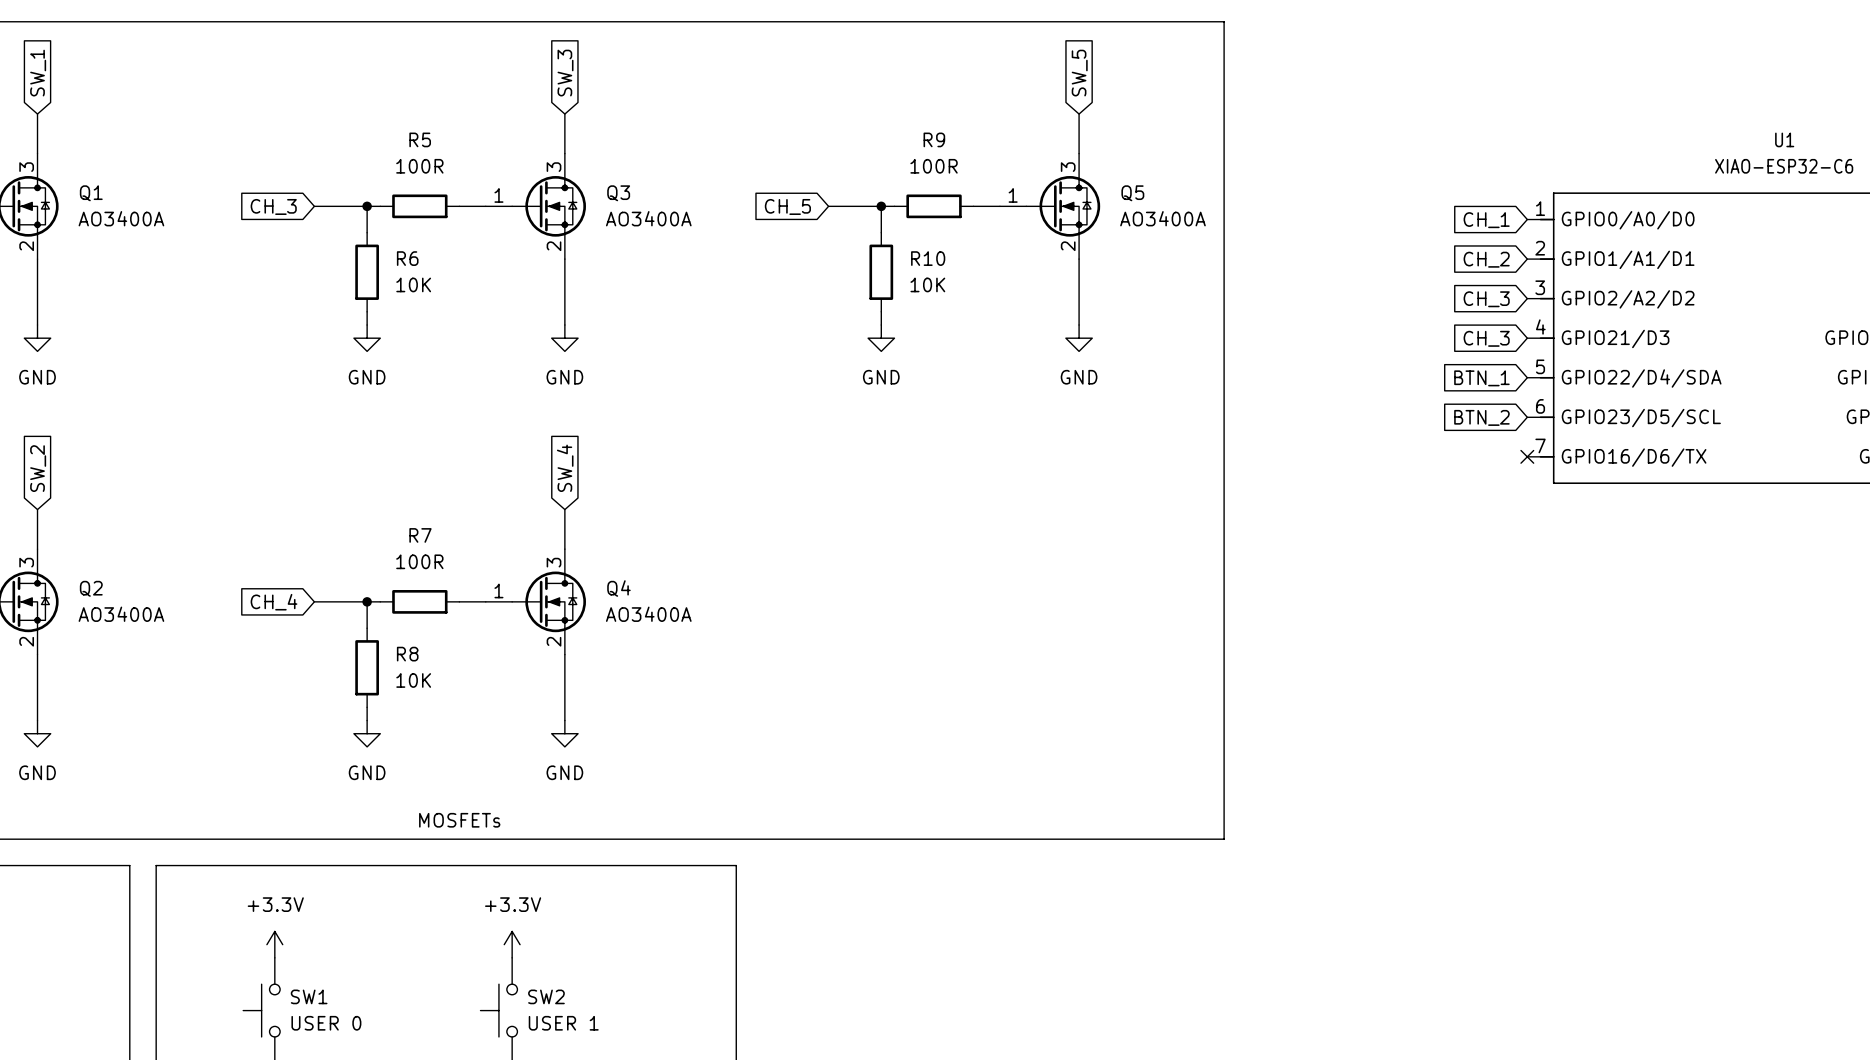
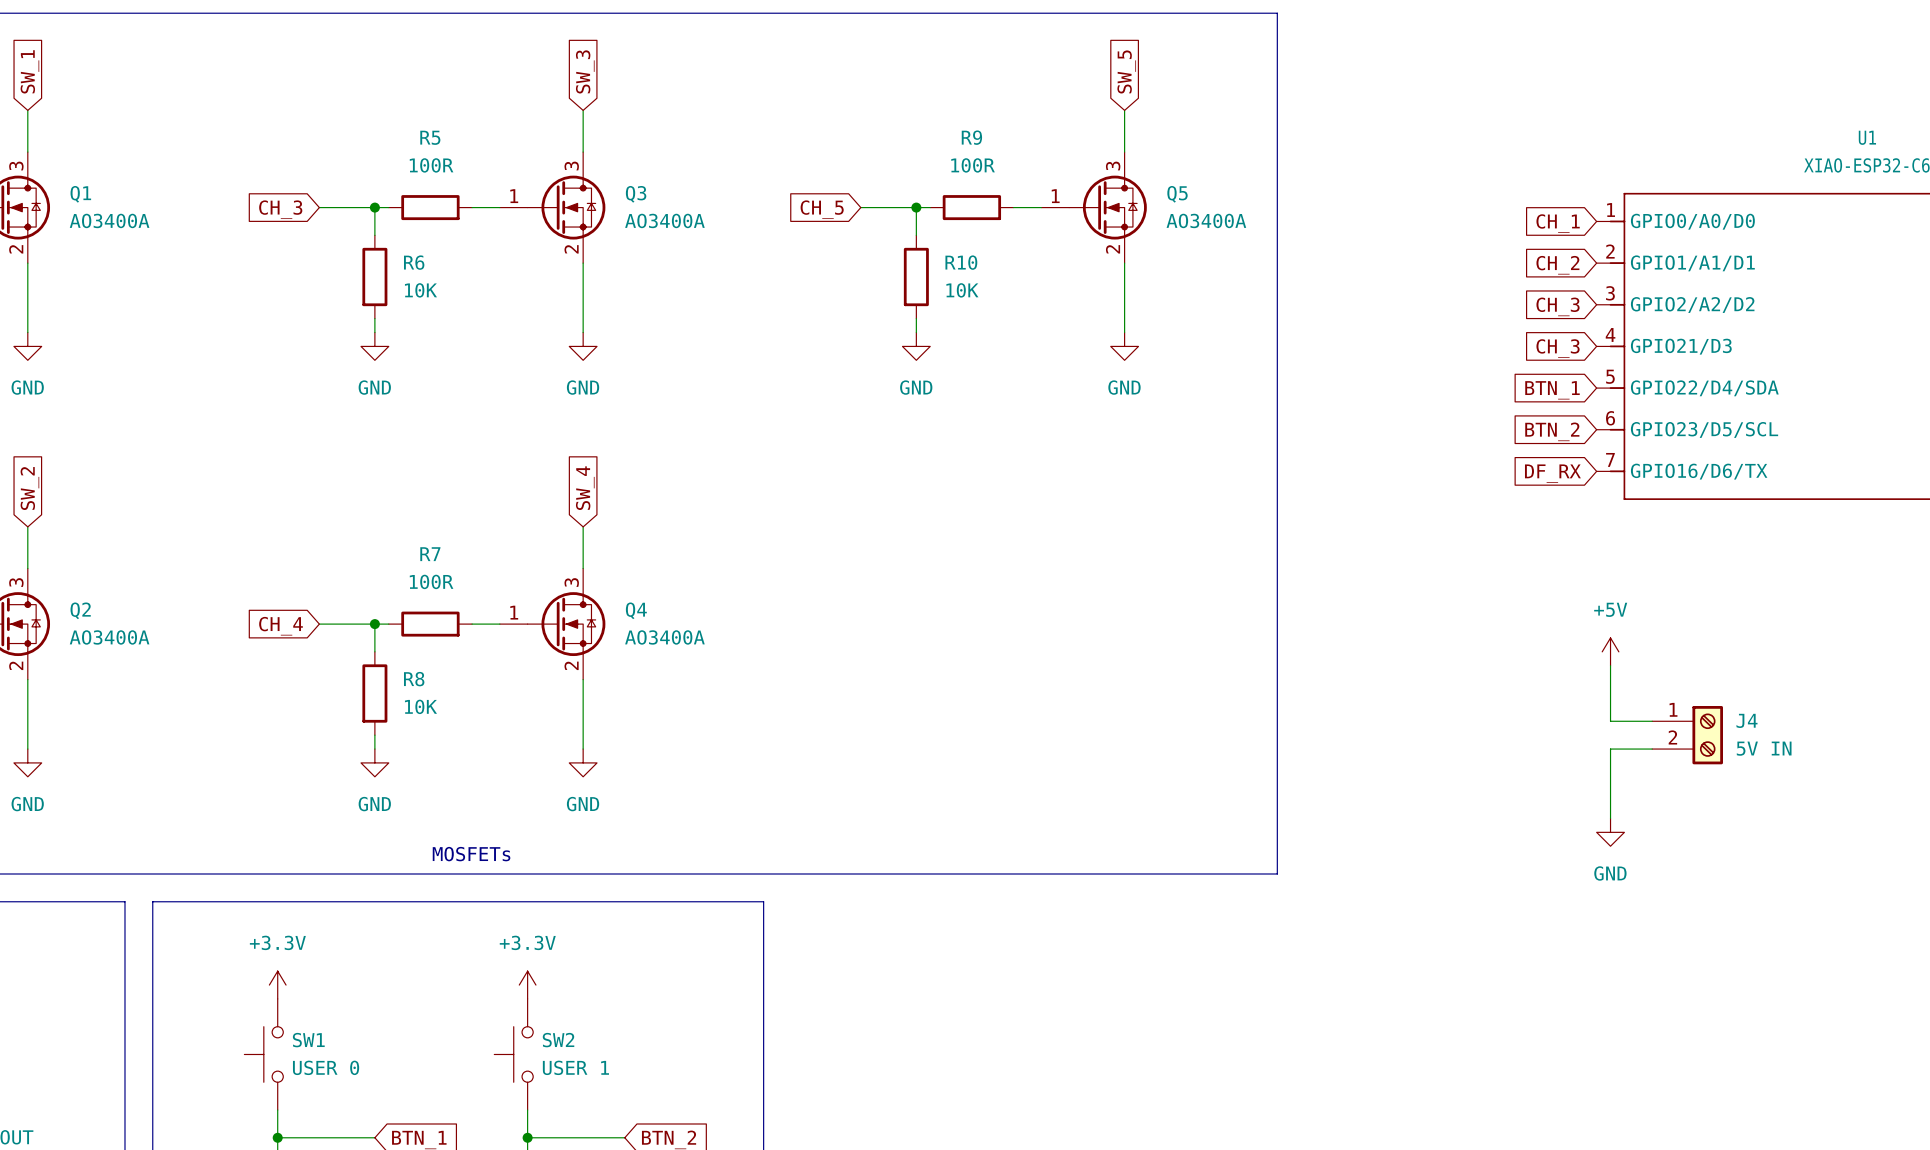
no-connect mark: (1527, 456) -> none
global label: none -> DF_RX (1552, 473)
power symbol: none -> +5V (1610, 651)
wire: none -> (1610, 665) (1610, 721) (1652, 721)
J4: none -> 5V IN (1687, 735)
wire: none -> (1652, 749) (1610, 749) (1610, 818)
power symbol: none -> GND (1610, 832)

